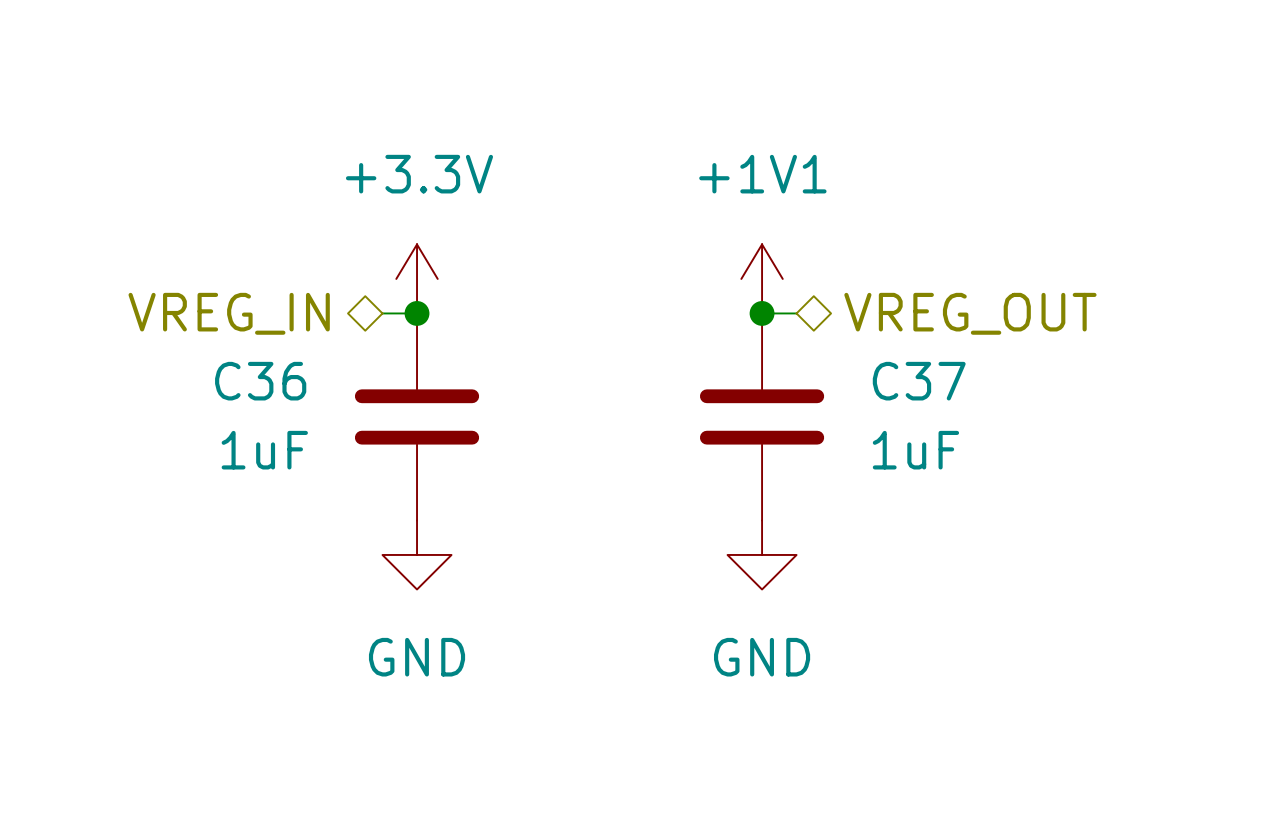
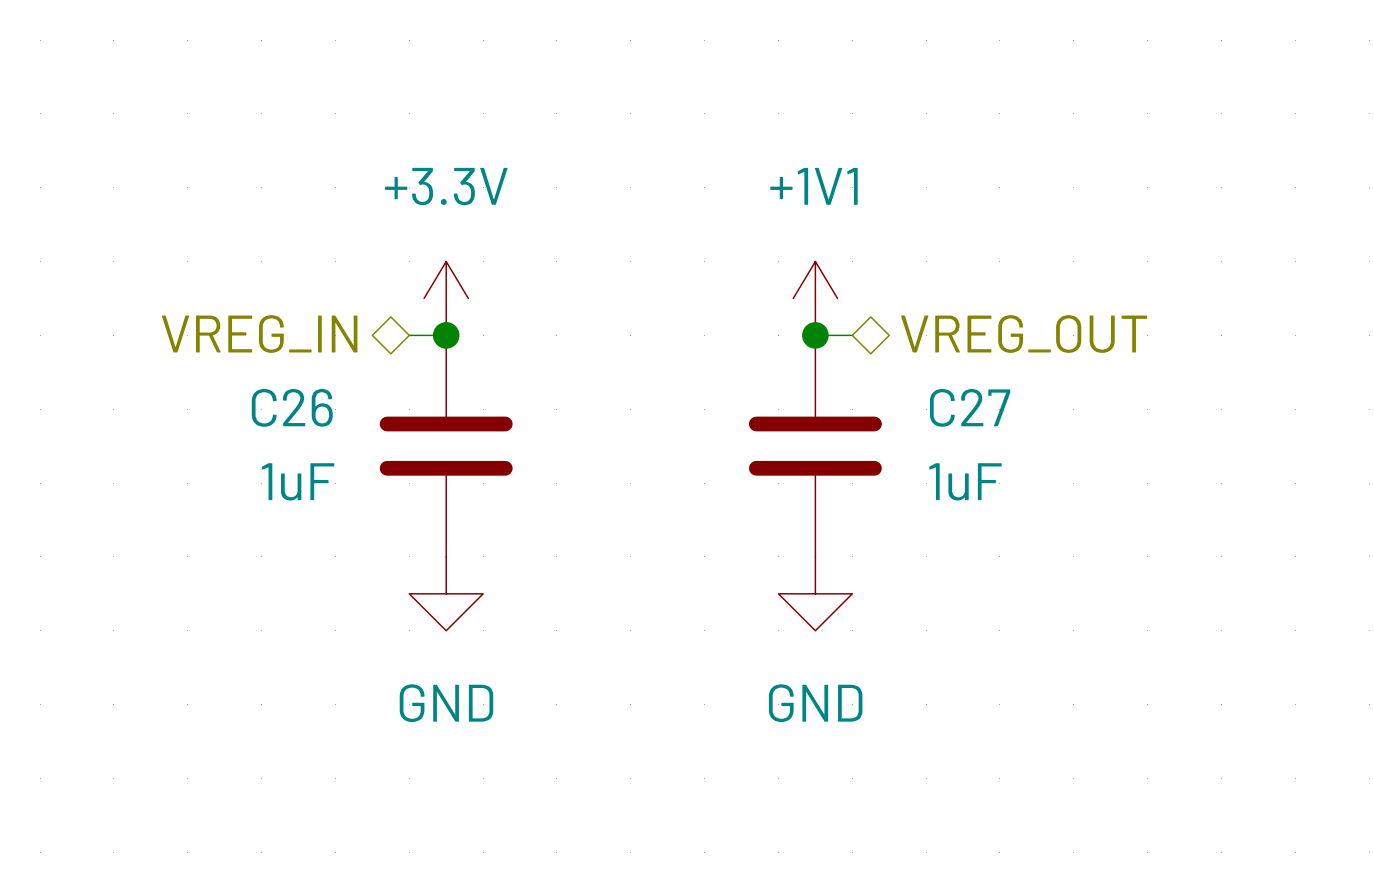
C36 name: C36 (260, 381) -> C26 (292, 407)
C37 name: C37 (919, 381) -> C27 (970, 407)

